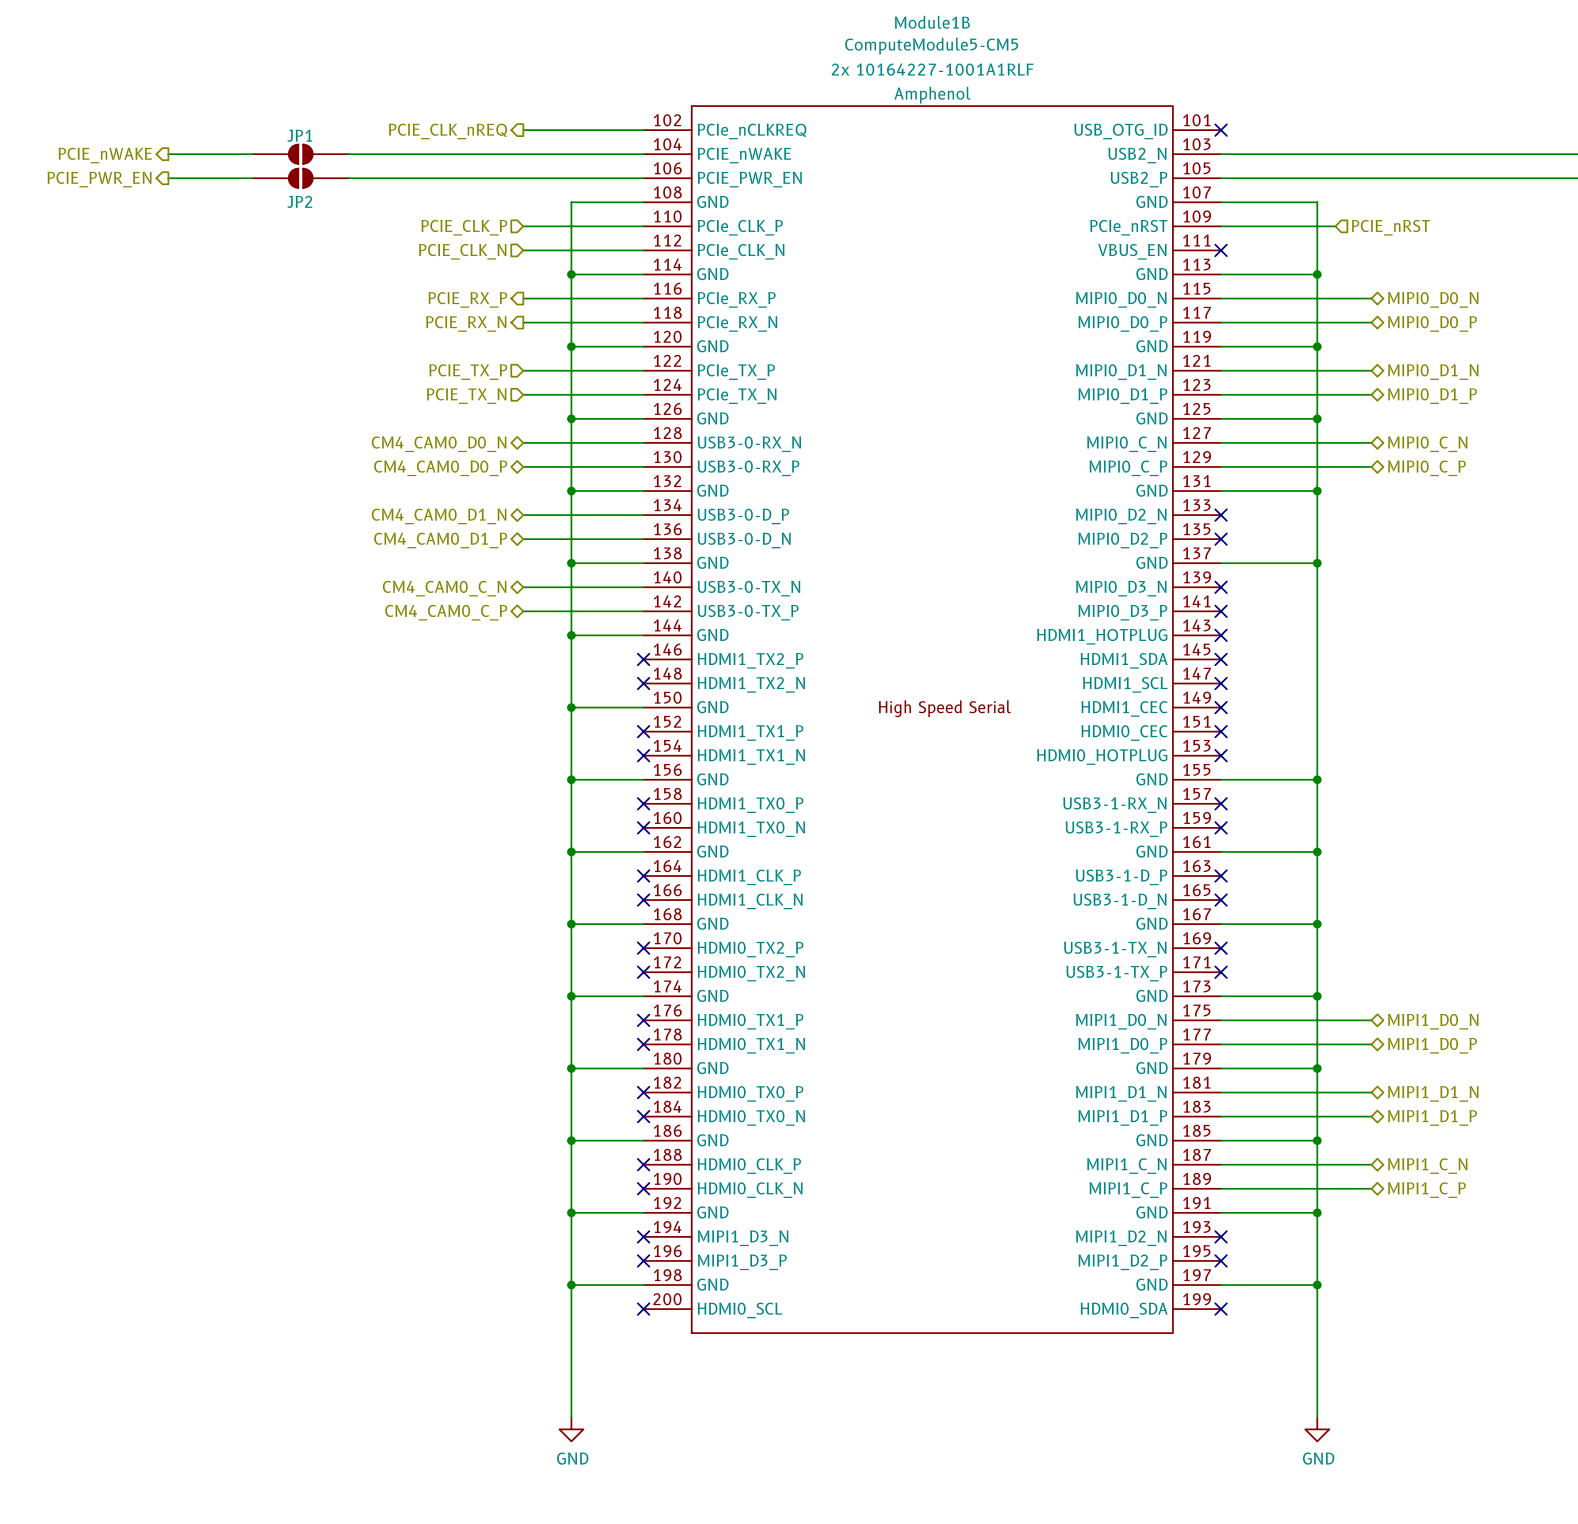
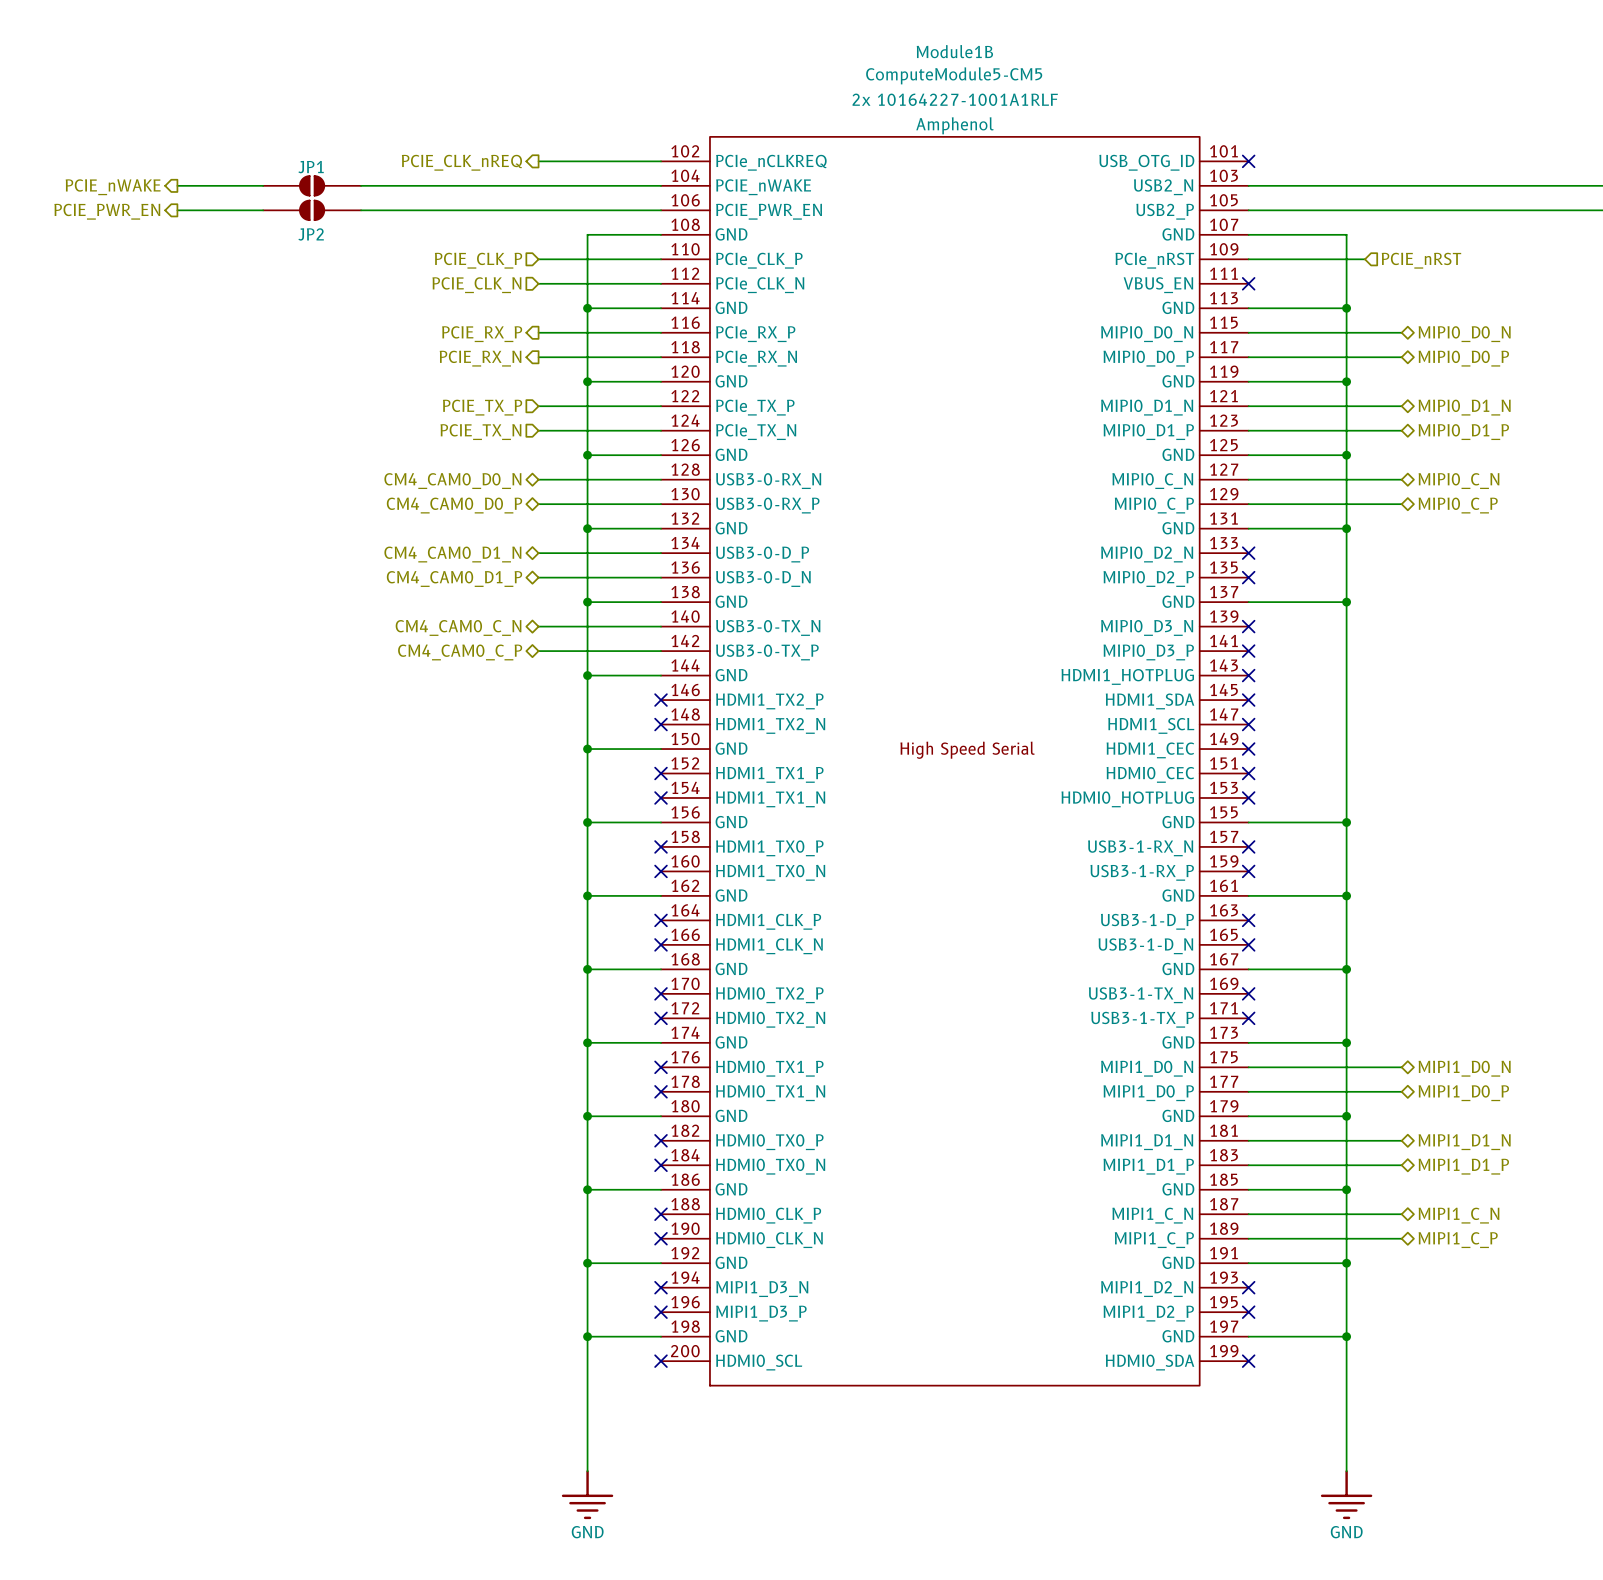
power symbol: GND (571, 1429) -> none
power symbol: GND (1317, 1429) -> none
power symbol: none -> GND (587, 1494)
power symbol: none -> GND (1346, 1494)

